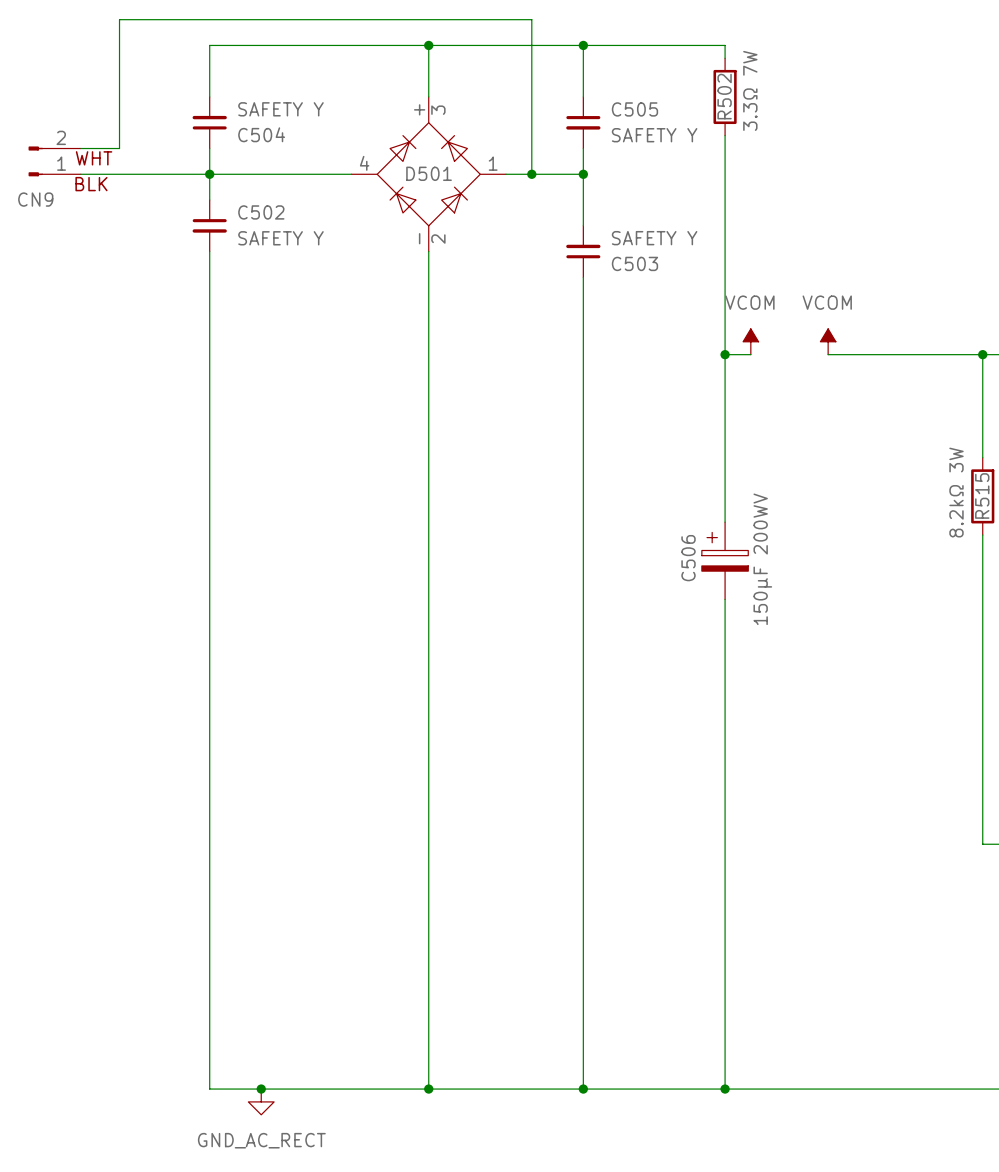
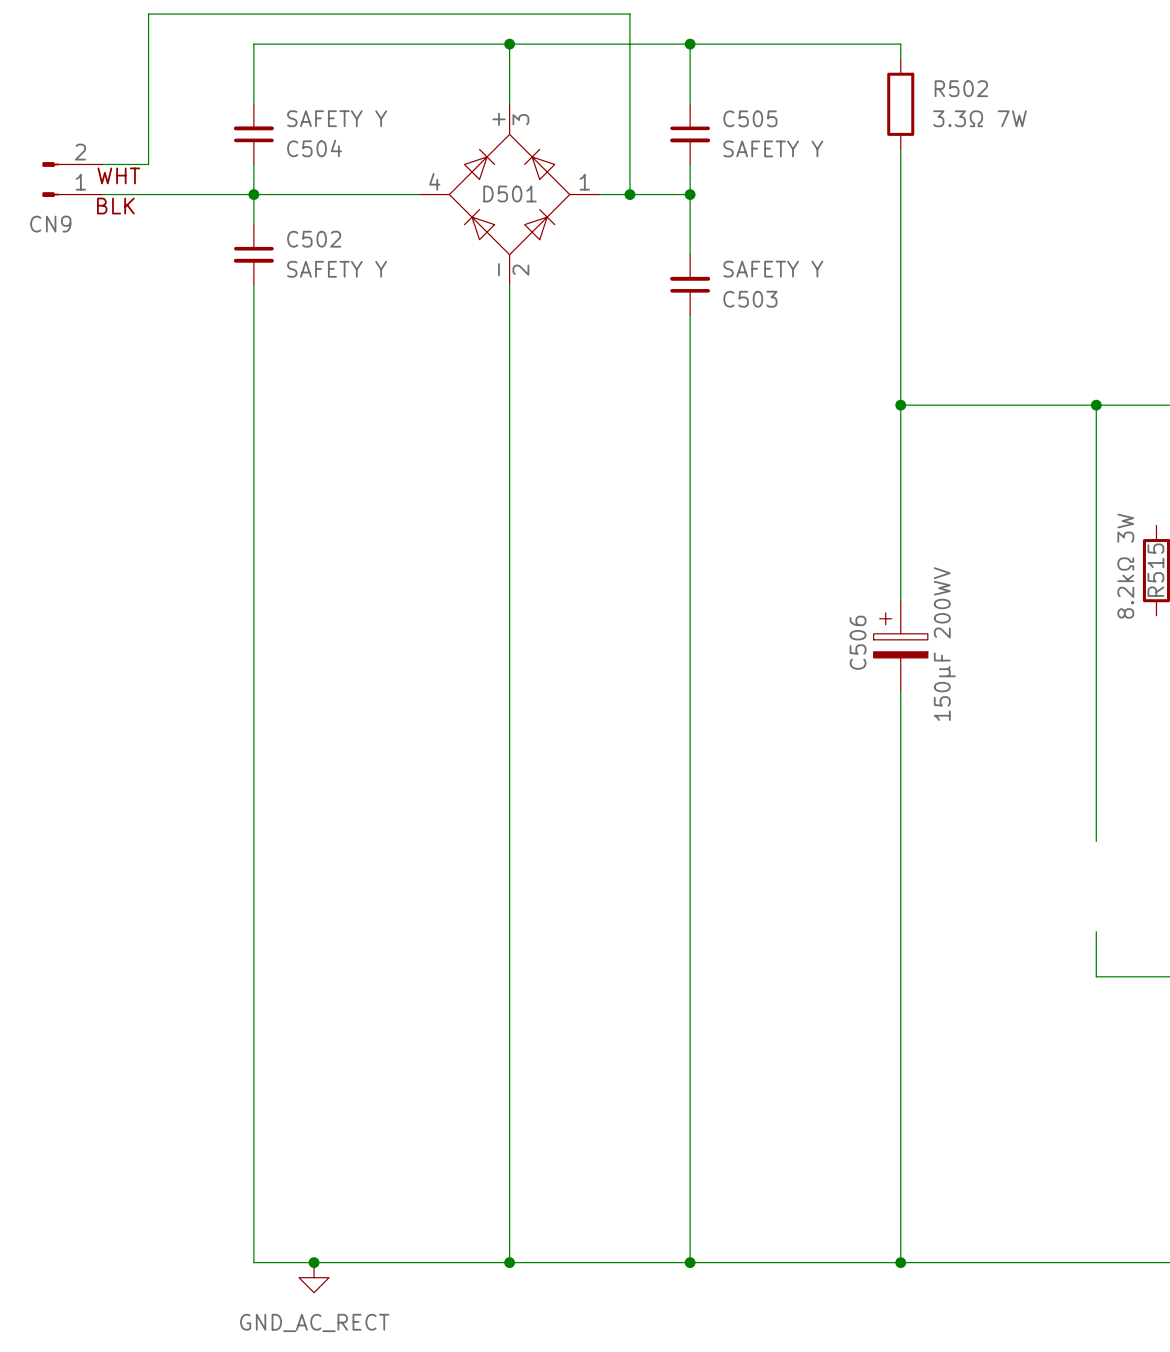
wire: (725, 45) (725, 58) -> (855, 44) (900, 44) (900, 59)
R502 value rotation: 0° (750, 90) -> 90° clockwise (980, 118)
R502 name rotation: 0° (724, 96) -> 90° clockwise (961, 88)
R502 position: (725, 96) -> (900, 104)
wire: (725, 135) (725, 522) -> (900, 149) (900, 600)
power symbol: VCOM (750, 341) -> none
power symbol: VCOM (828, 341) -> none
wire: (725, 354) (750, 354) -> none
junction position: (725, 354) -> (900, 405)
wire: none -> (900, 405) (975, 405)
wire: none -> (1096, 405) (1096, 841)
wire: (982, 354) (982, 457) -> none
junction position: (982, 354) -> (1096, 405)
wire: (982, 535) (982, 844) -> (1096, 931) (1096, 976) (1156, 976)
C506 position: (725, 560) -> (900, 645)
wire: (725, 599) (725, 1089) -> (900, 690) (900, 1262)
junction position: (725, 1089) -> (900, 1262)

